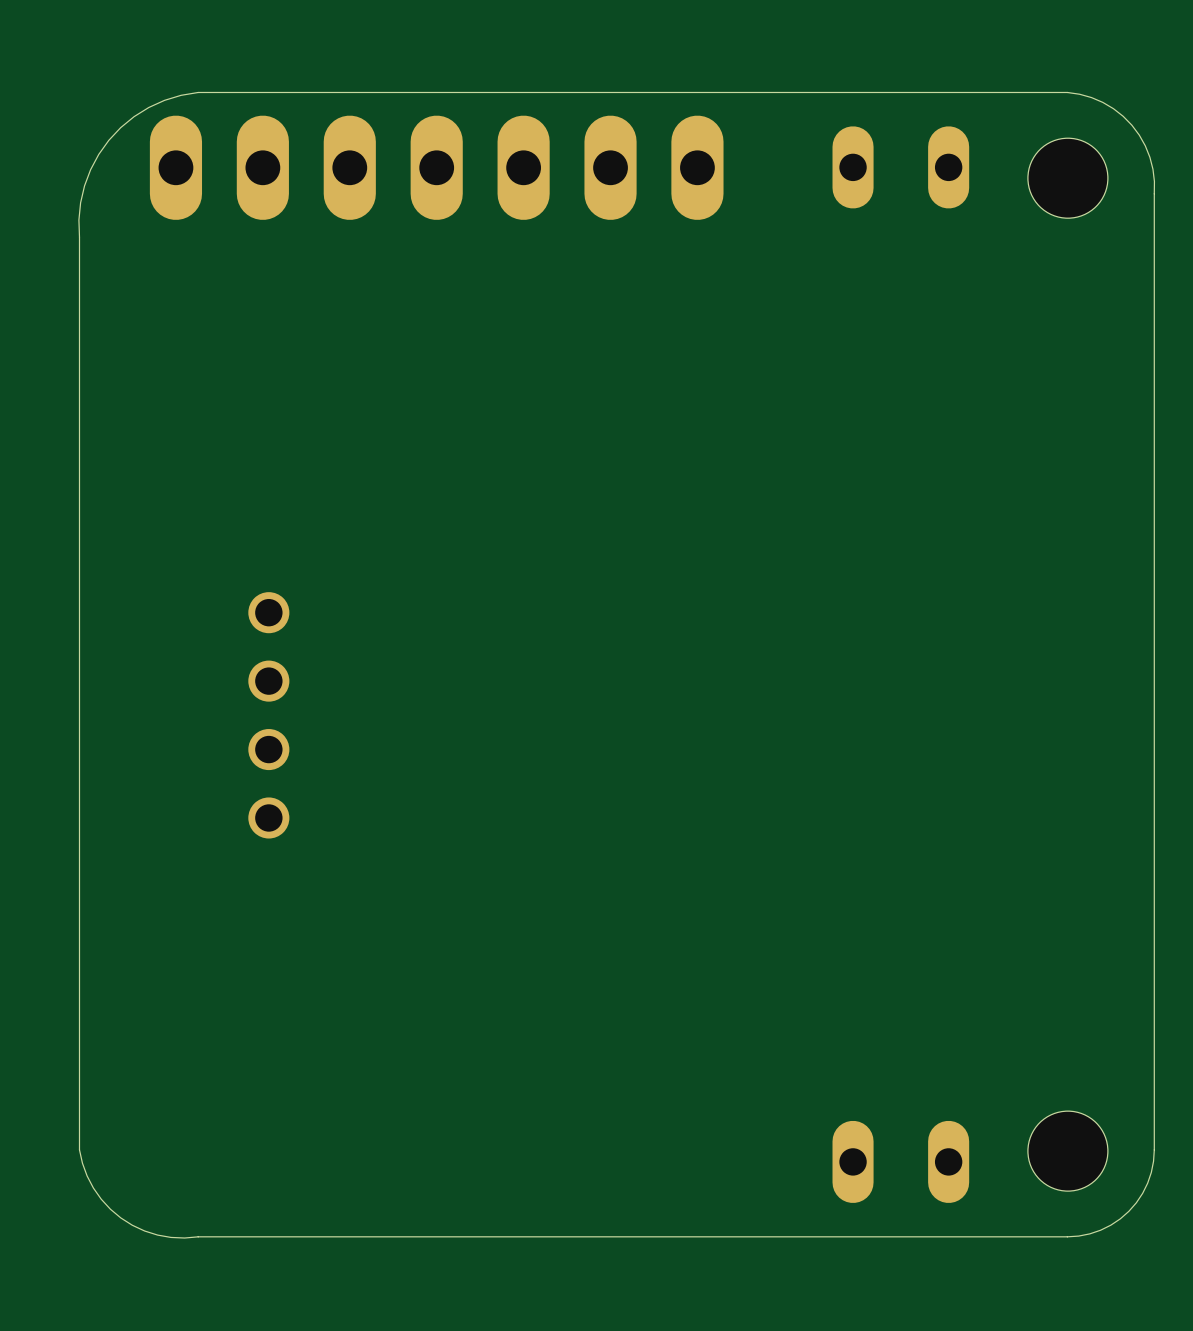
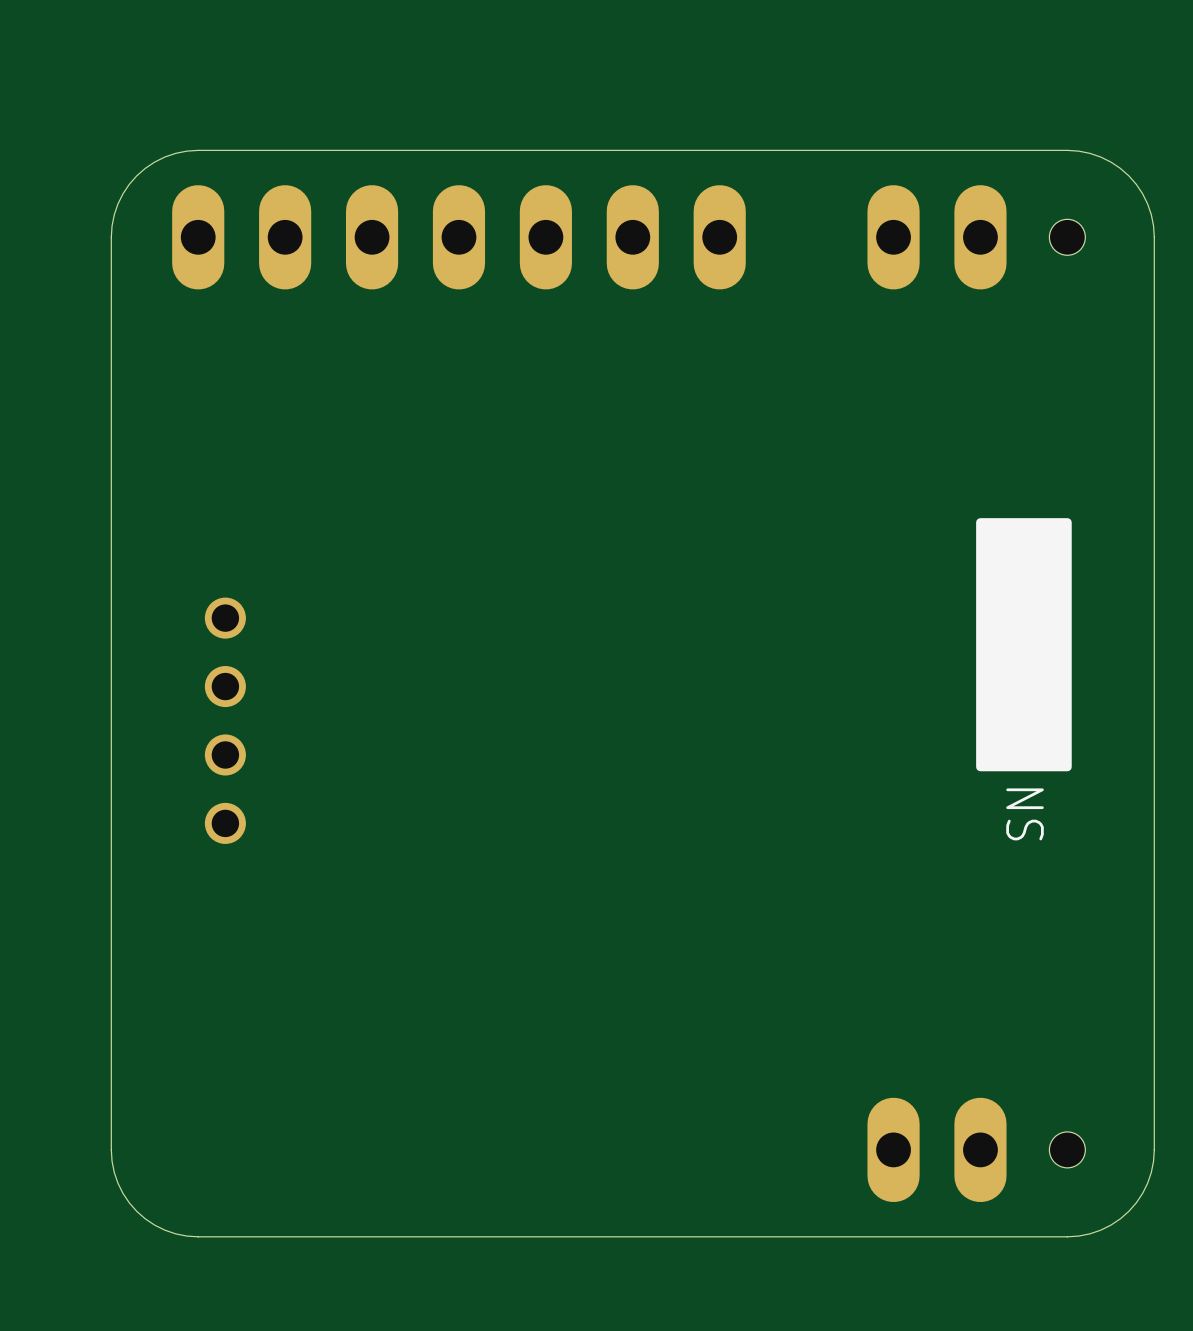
part position: (436, 167) -> (458, 237)
part: (900, 167) -> none
hole: (1067, 178) -> none
part: none -> (937, 237)
hole: none -> (1067, 237)
board edge: (1154, 237) (1152, 169) (1145, 145) (1139, 135) (1123, 116) (1102, 102) (1091, 97) (1067, 92) (198, 92) (164, 100) (148, 107) (120, 127) (108, 140) (90, 169) (84, 185) (78, 219) (79, 1149) (87, 1175) (93, 1188) (101, 1199) (120, 1217) (144, 1231) (157, 1235) (171, 1237) (198, 1236) -> (1154, 237) (1147, 204) (1128, 175) (1100, 157) (1067, 150) (198, 150) (164, 157) (136, 175) (117, 204) (111, 237) (111, 1149) (117, 1183) (136, 1211) (164, 1230) (198, 1236)
drawing: none -> [976, 518, 1072, 772]
part position: (268, 715) -> (225, 720)
text: none -> SN (1025, 814)
hole size: [1027, 1111, 1108, 1192] -> [1049, 1131, 1086, 1168]
part: none -> (937, 1149)
part: (900, 1161) -> none

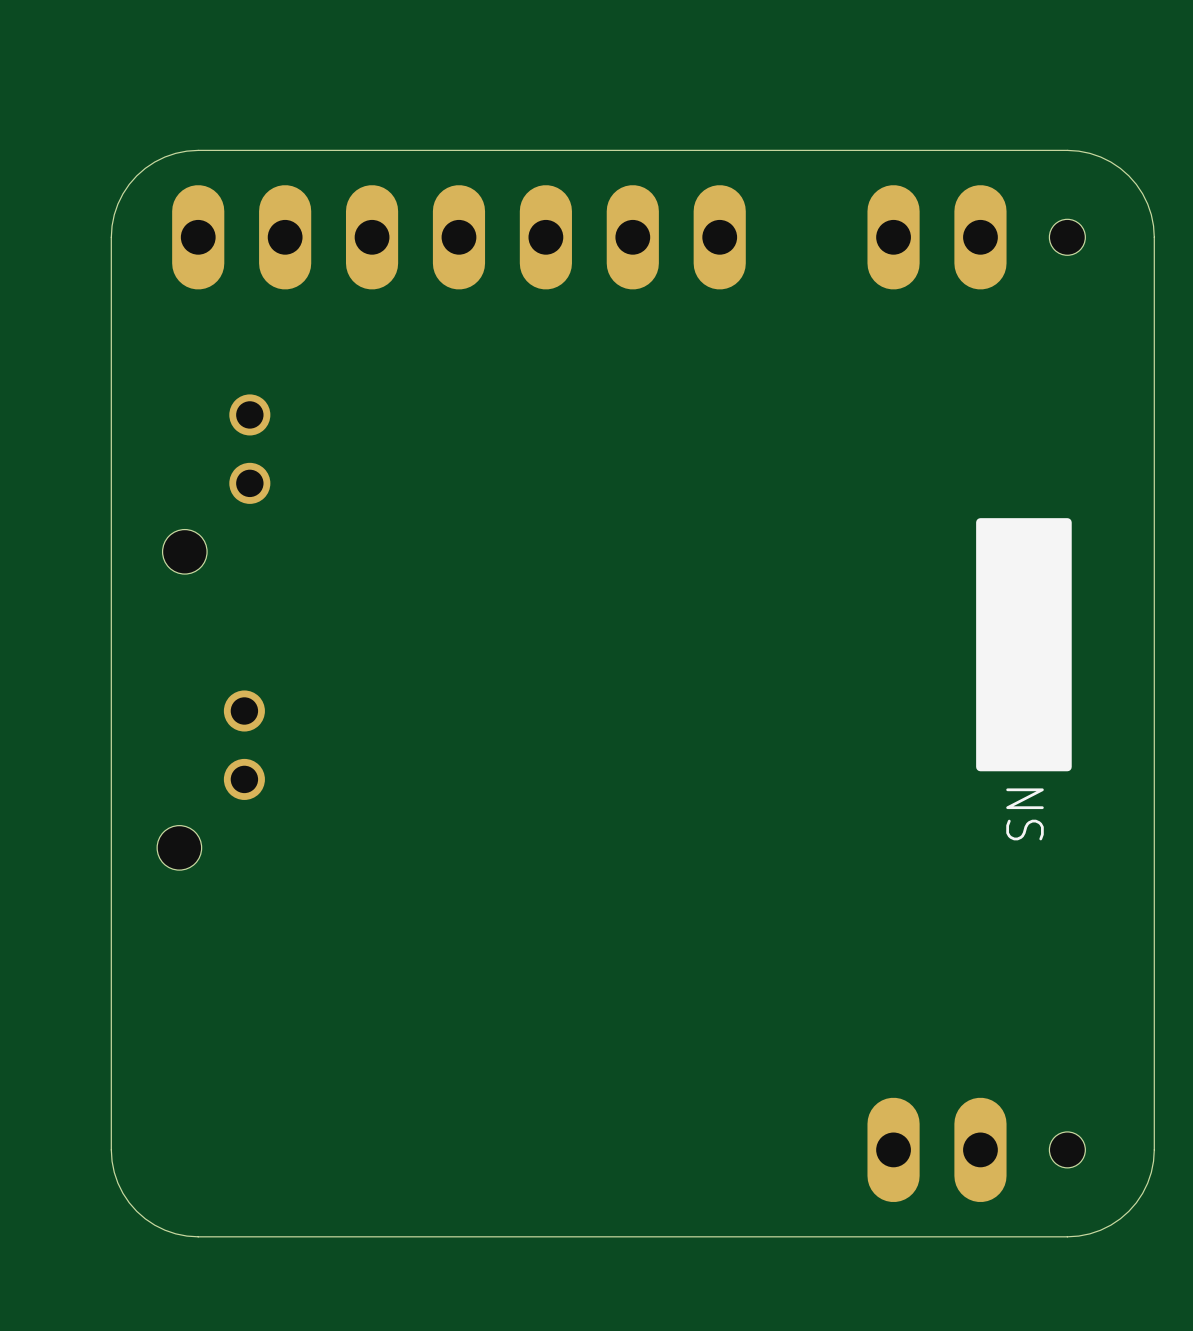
part: none -> (216, 484)
part: (225, 720) -> none
part: none -> (211, 780)

